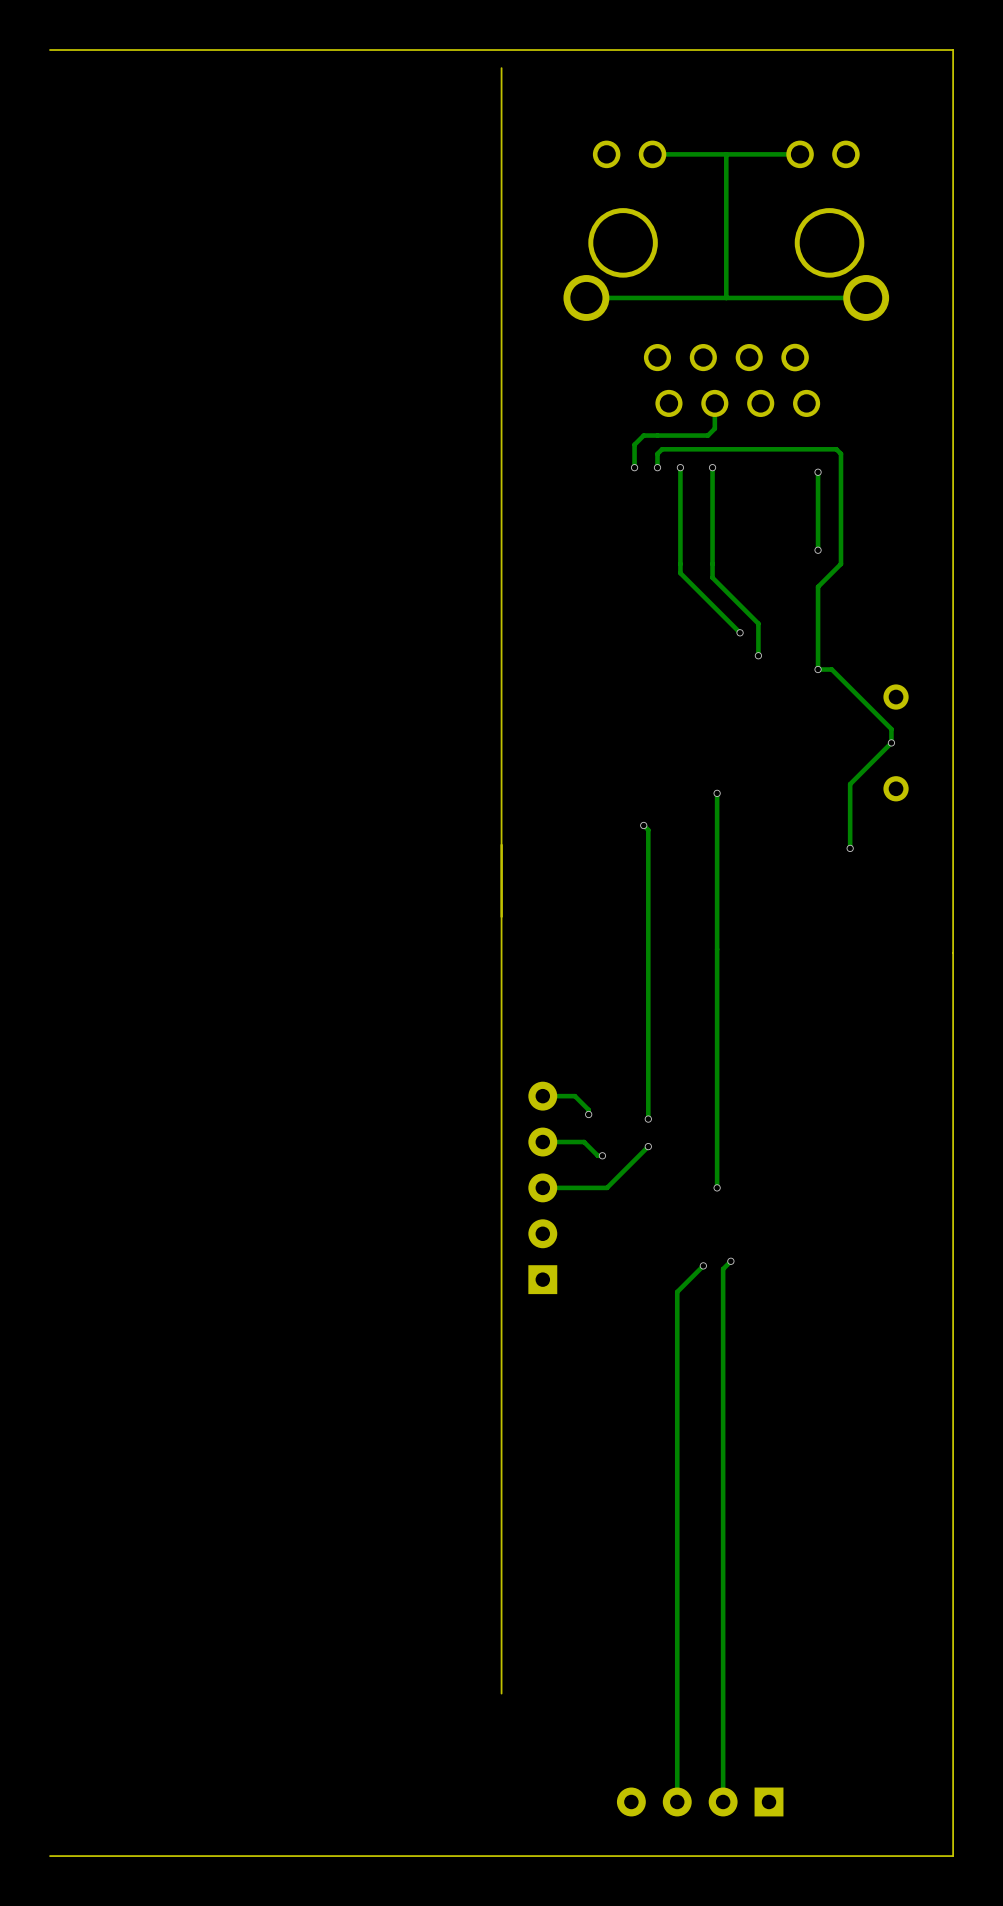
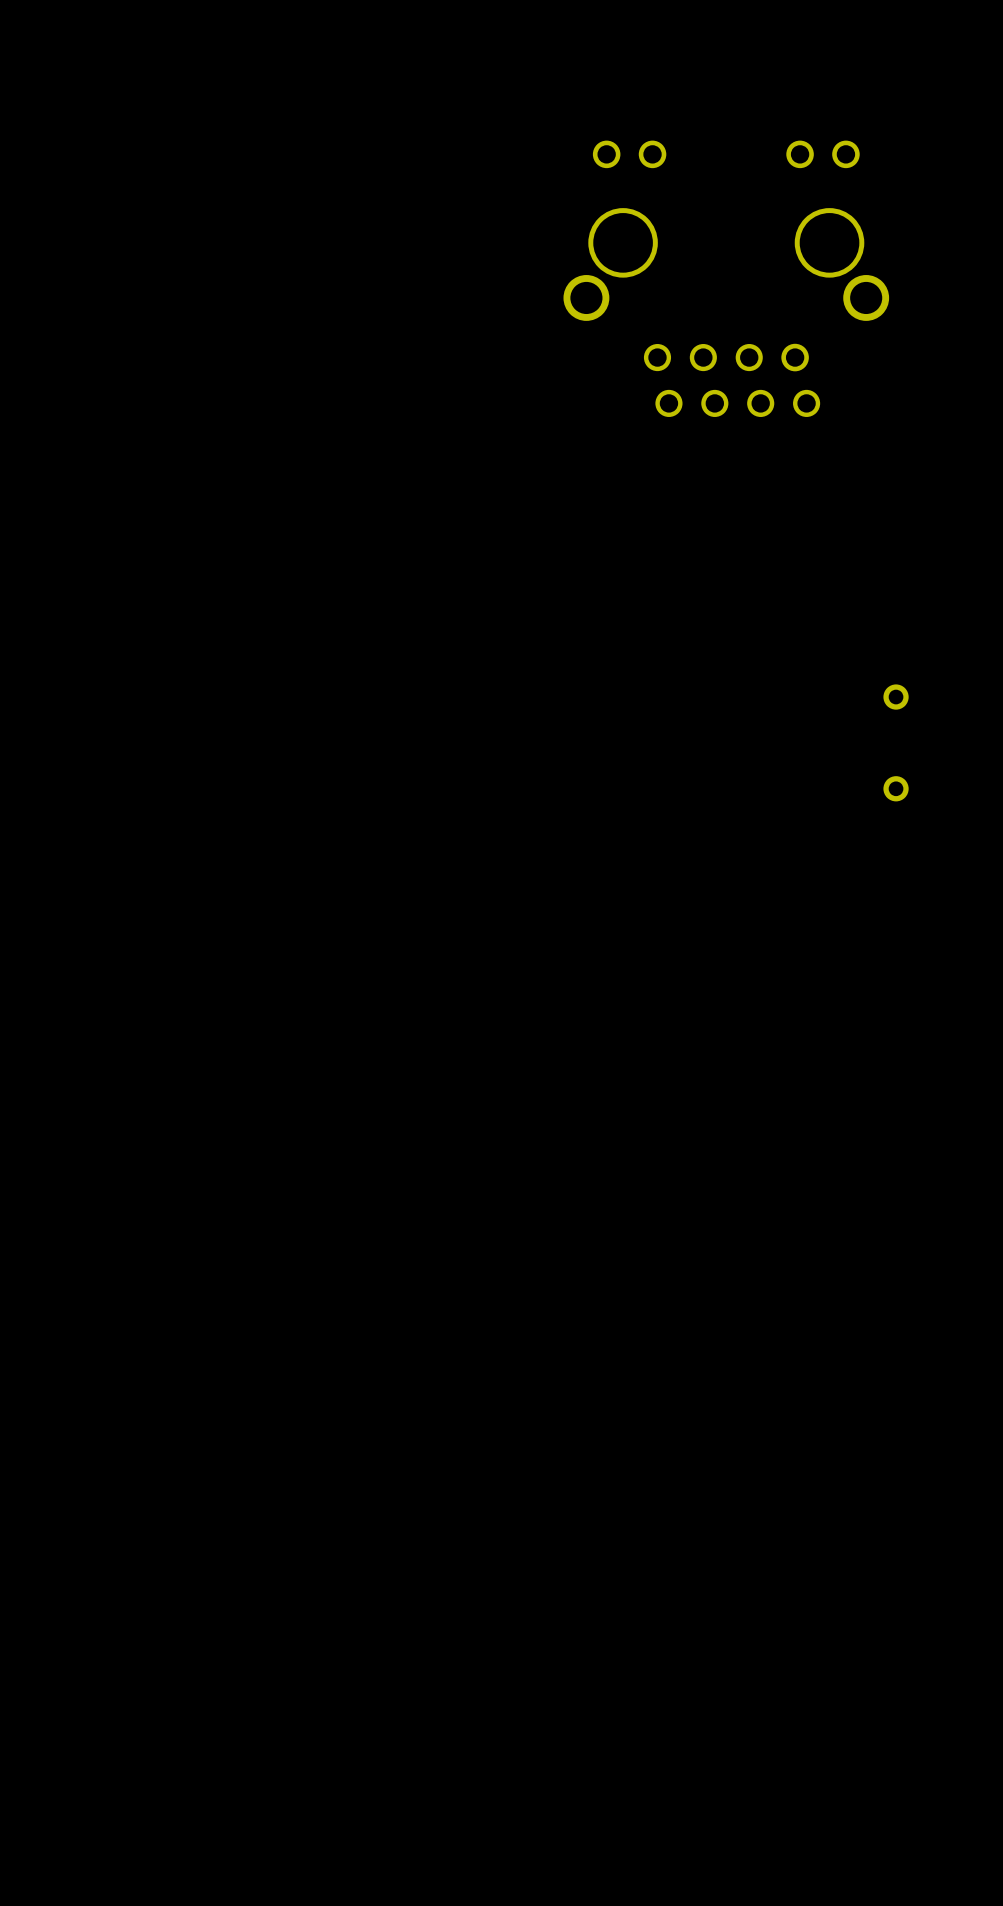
board edge: (50, 50) (953, 50) (953, 1856) (50, 1856) -> none
board edge: (501, 68) (501, 1693) -> none
track: (726, 154) (726, 297) -> none
track: (800, 154) (652, 154) -> none
track: (866, 297) (586, 297) -> none
track: (714, 403) (714, 428) (707, 435) (643, 435) (634, 444) (634, 467) -> none
via: (634, 467) -> none
track: (657, 467) (657, 453) (662, 449) (836, 449) (840, 453) (840, 563) (818, 586) (818, 669) (831, 669) (891, 729) (891, 742) (850, 784) (850, 848) -> none
via: (657, 467) -> none
track: (680, 467) (680, 573) (740, 632) -> none
via: (680, 467) -> none
track: (712, 467) (712, 577) (758, 623) (758, 655) -> none
via: (712, 467) -> none
track: (818, 472) (818, 550) -> none
via: (818, 472) -> none
via: (818, 550) -> none
via: (740, 632) -> none
via: (758, 655) -> none
via: (818, 669) -> none
via: (891, 742) -> none
track: (717, 793) (717, 1187) -> none
via: (717, 793) -> none
track: (643, 825) (648, 830) (648, 1119) -> none
via: (643, 825) -> none
via: (850, 848) -> none
track: (542, 1096) (574, 1096) (588, 1109) (588, 1114) -> none
via: (588, 1114) -> none
via: (648, 1119) -> none
track: (542, 1142) (584, 1142) (597, 1155) (602, 1155) -> none
track: (648, 1146) (607, 1187) (542, 1187) -> none
via: (648, 1146) -> none
via: (602, 1155) -> none
part: (542, 1187) -> none
via: (717, 1187) -> none
track: (730, 1261) (723, 1269) (723, 1801) -> none
via: (730, 1261) -> none
track: (703, 1265) (677, 1291) (677, 1801) -> none
via: (703, 1265) -> none
part: (700, 1801) -> none

